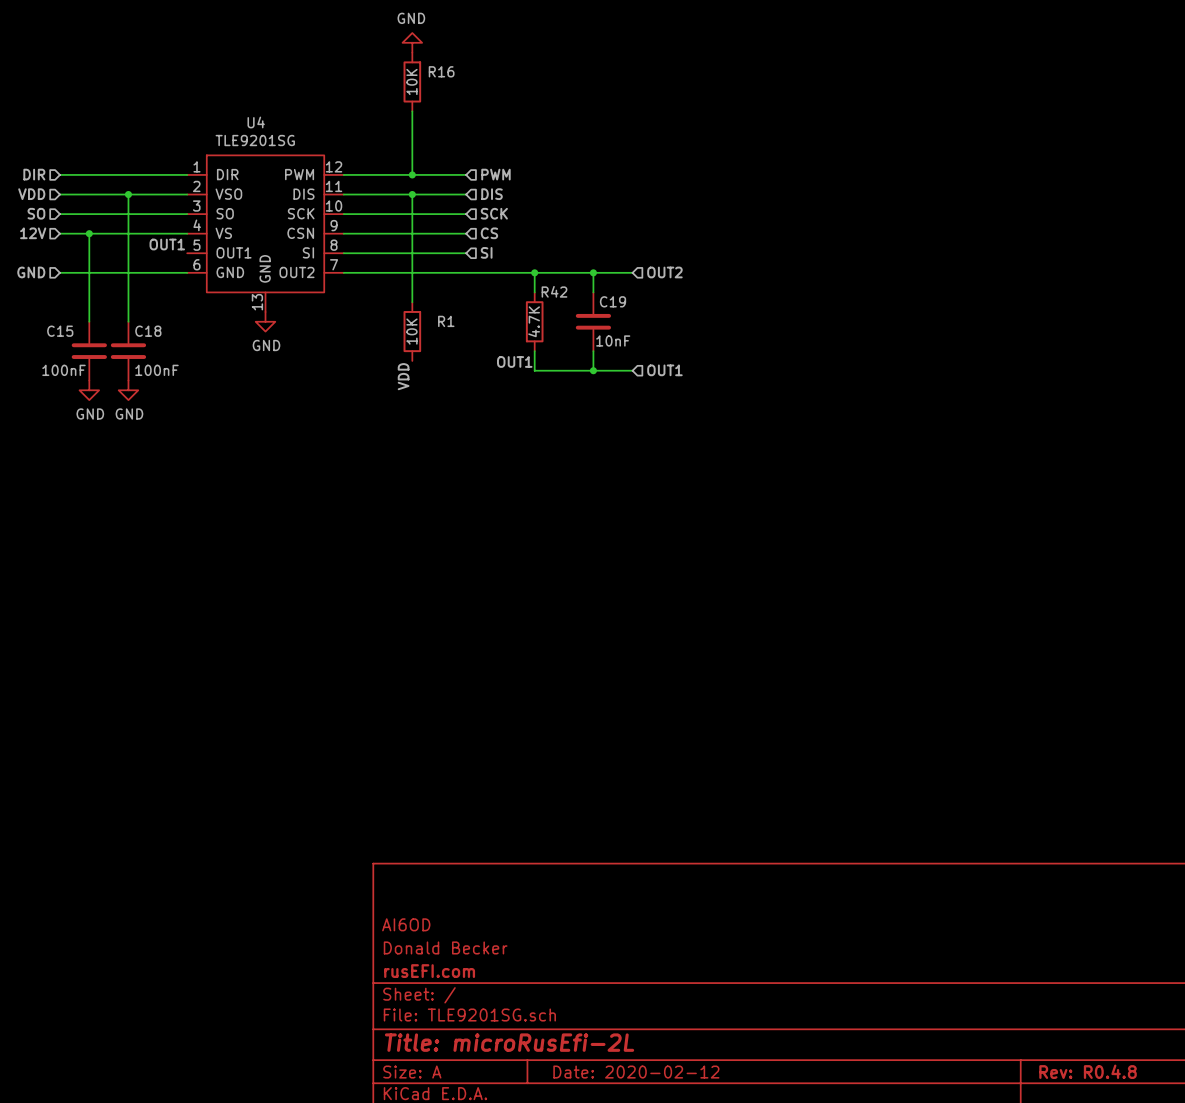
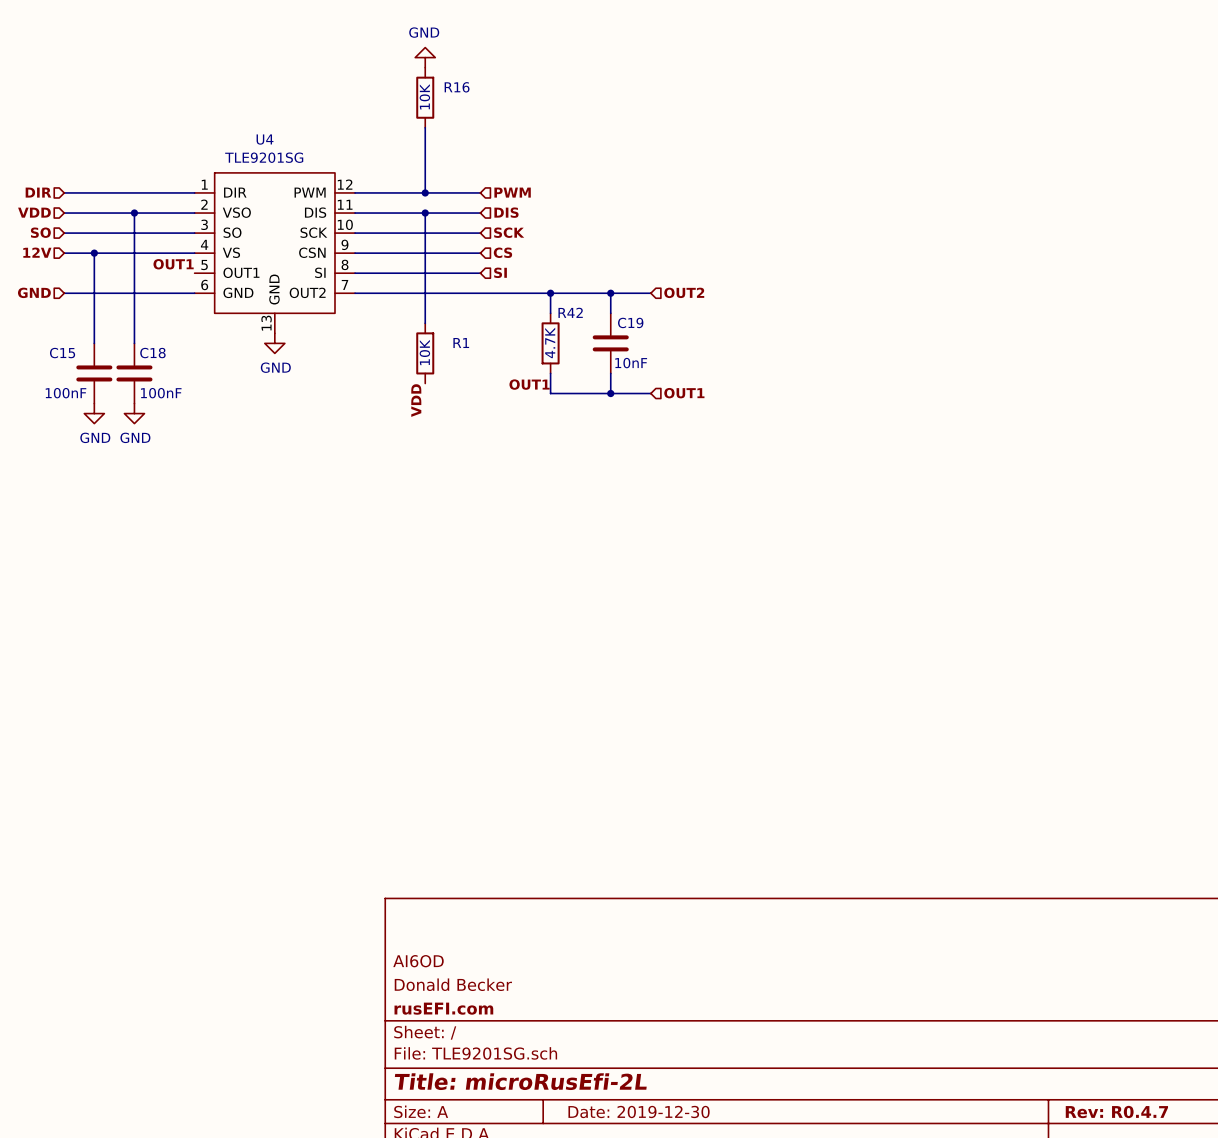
title block: Rev: R0.4.8 (1088, 1071) -> Rev: R0.4.7 (1116, 1111)
title block: Date: 2020-02-12 (636, 1072) -> Date: 2019-12-30 (639, 1111)

